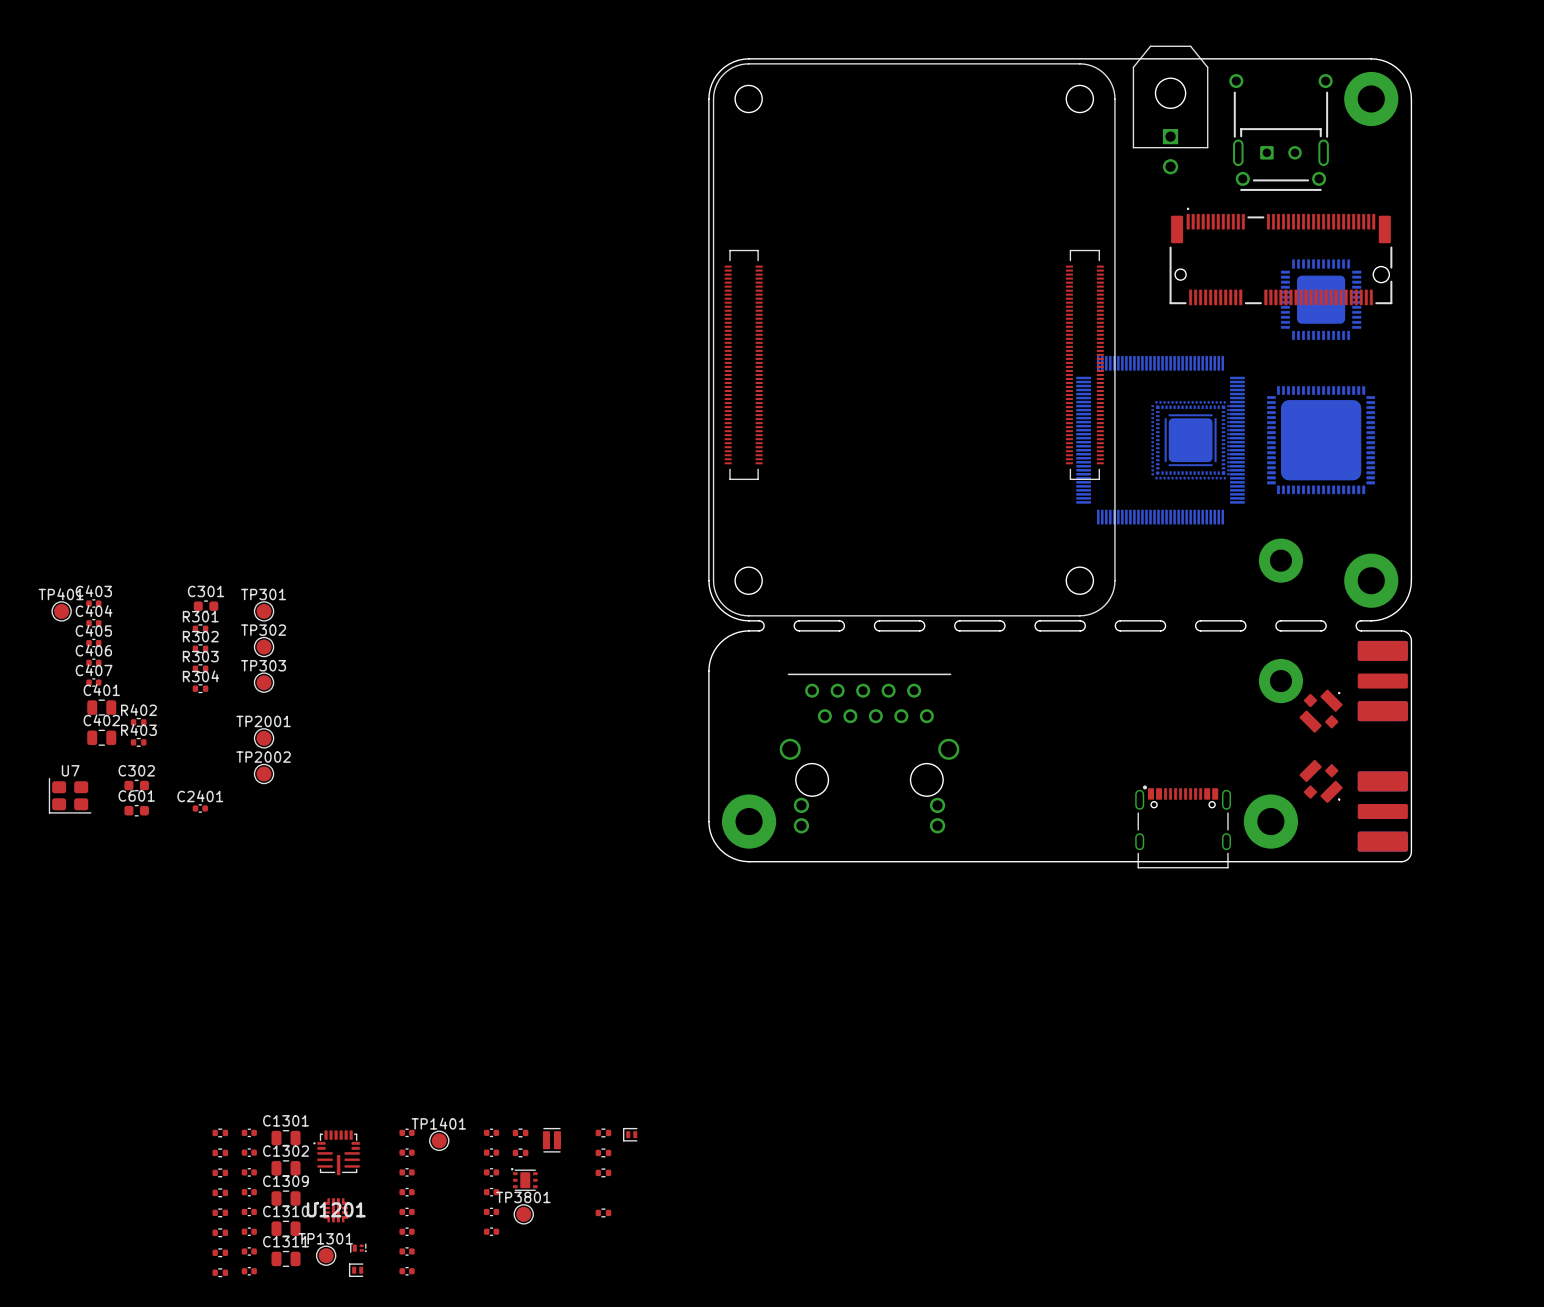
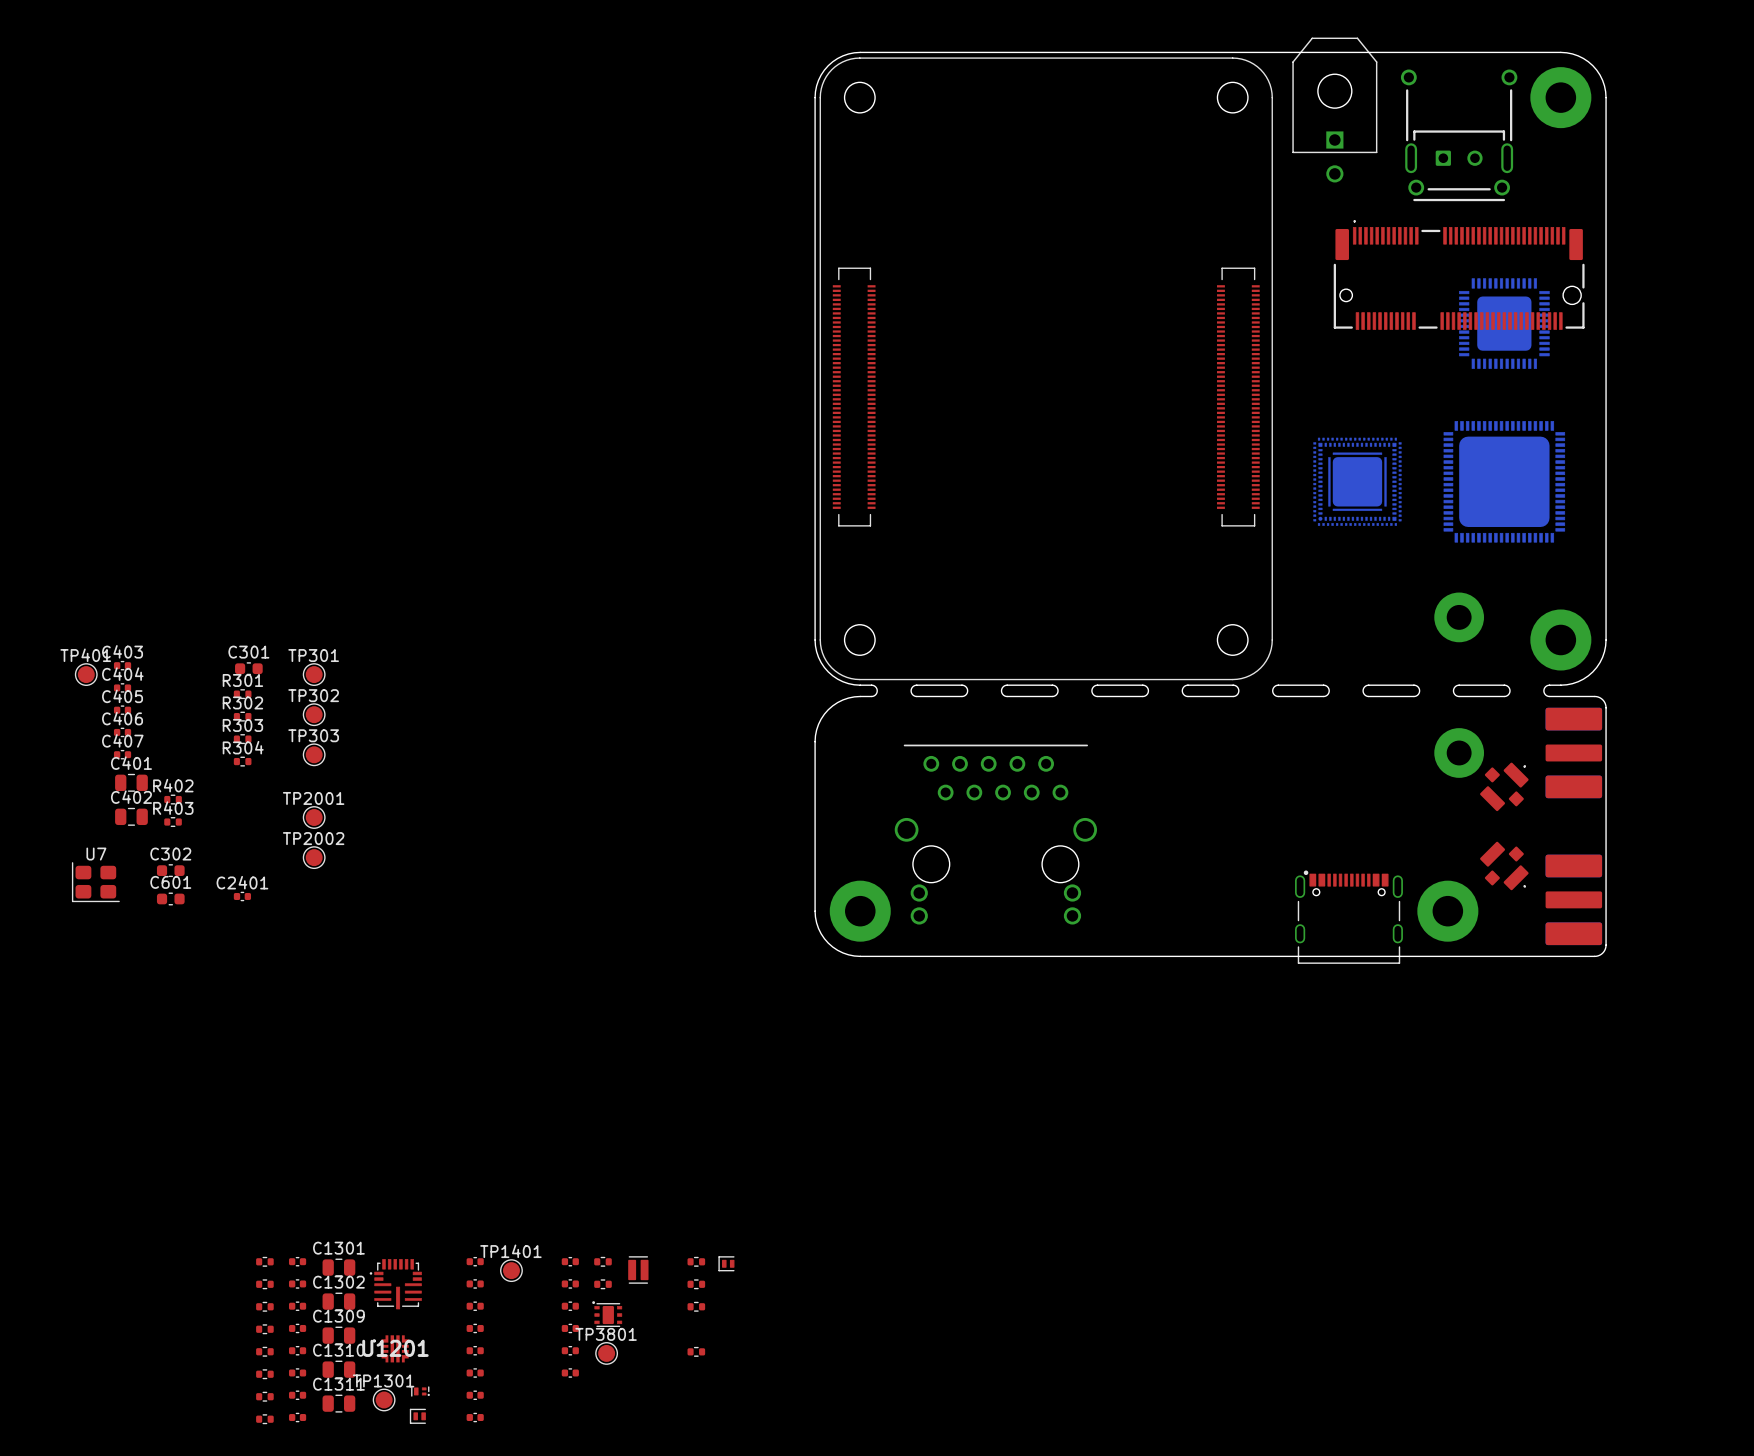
part: (1160, 440) -> none

